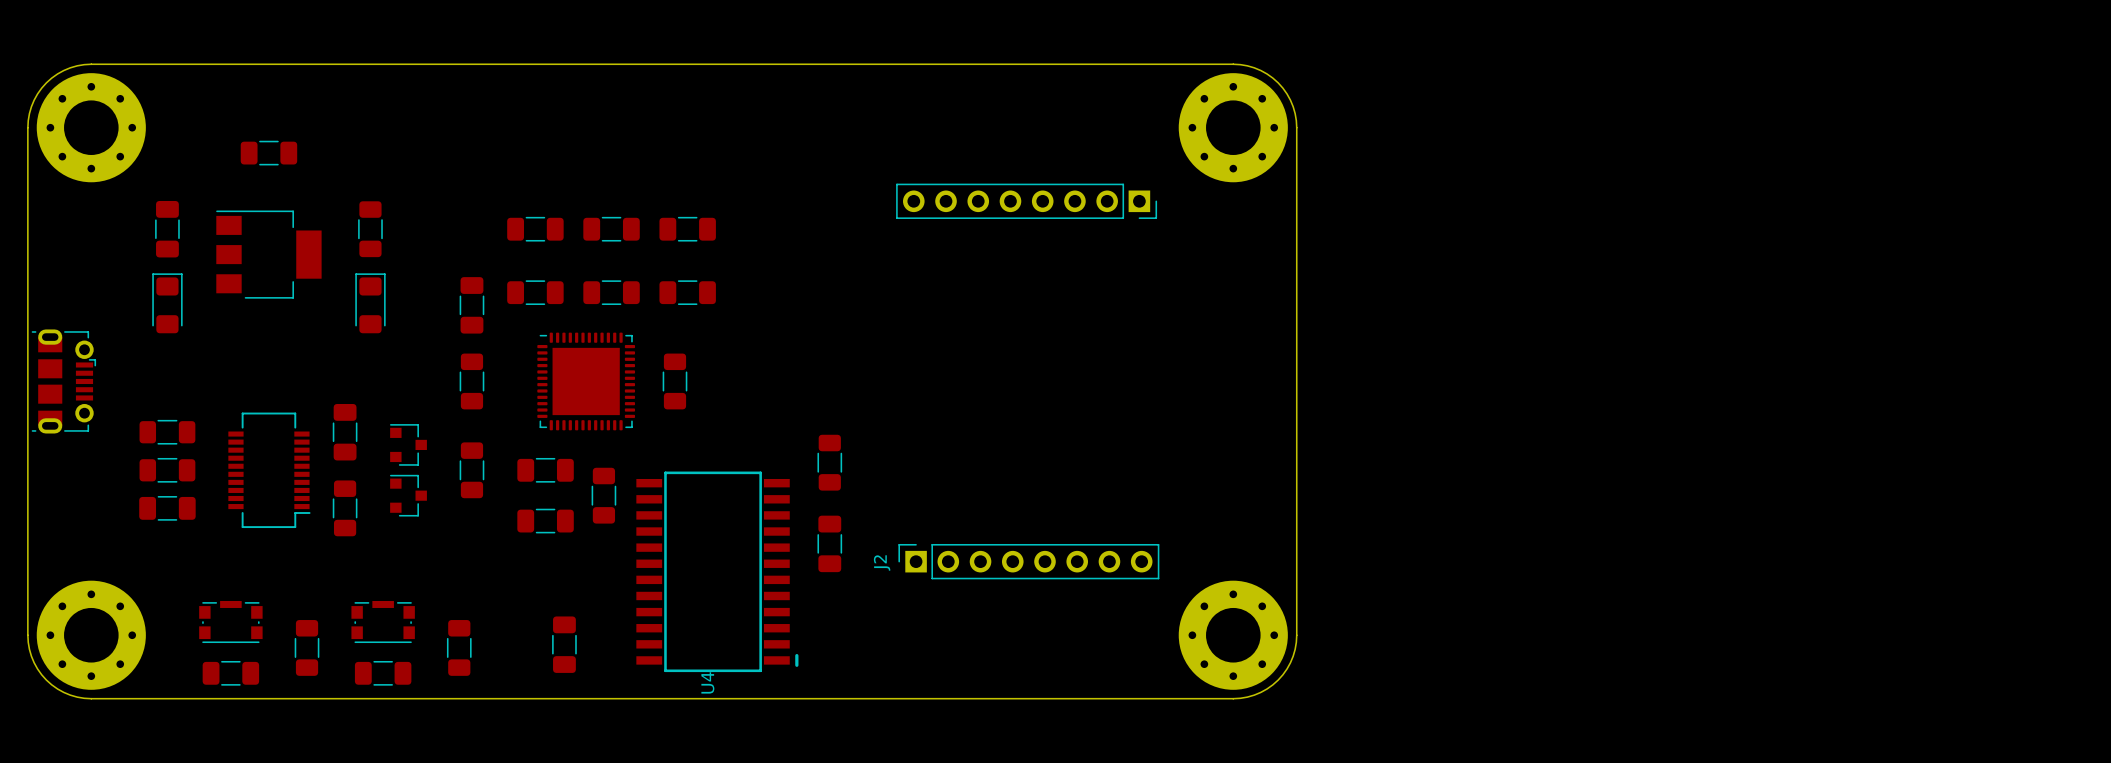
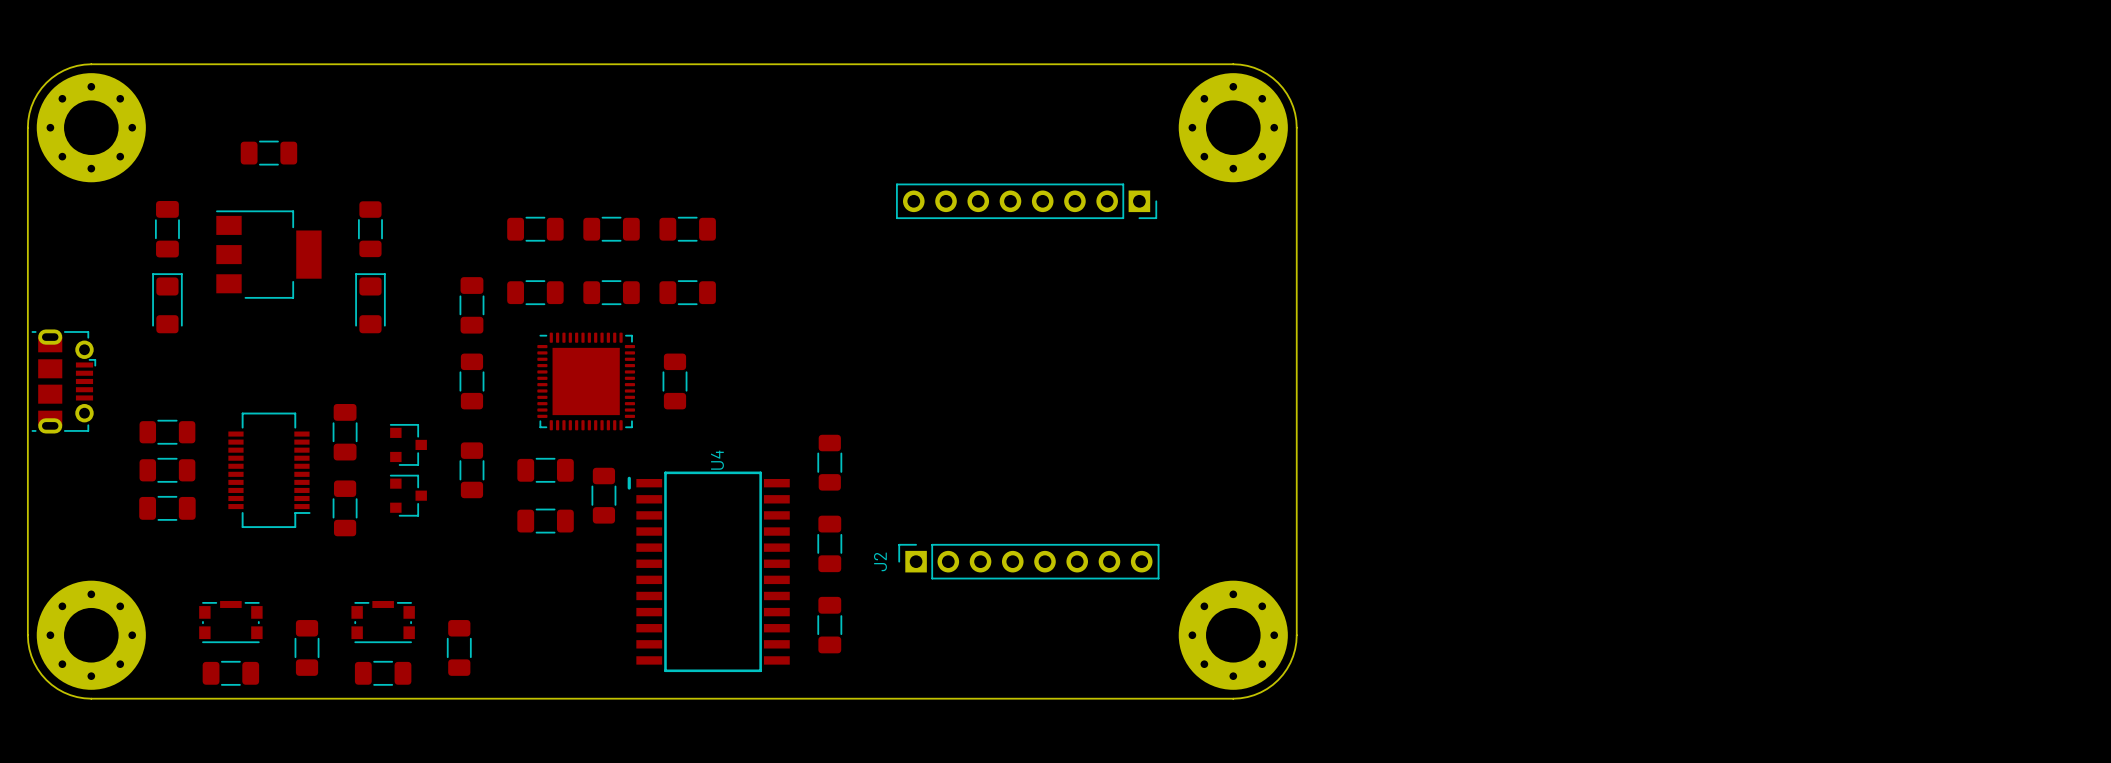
U4 rotation: 0° (717, 571) -> 180° (708, 571)
part position: (564, 644) -> (829, 625)

